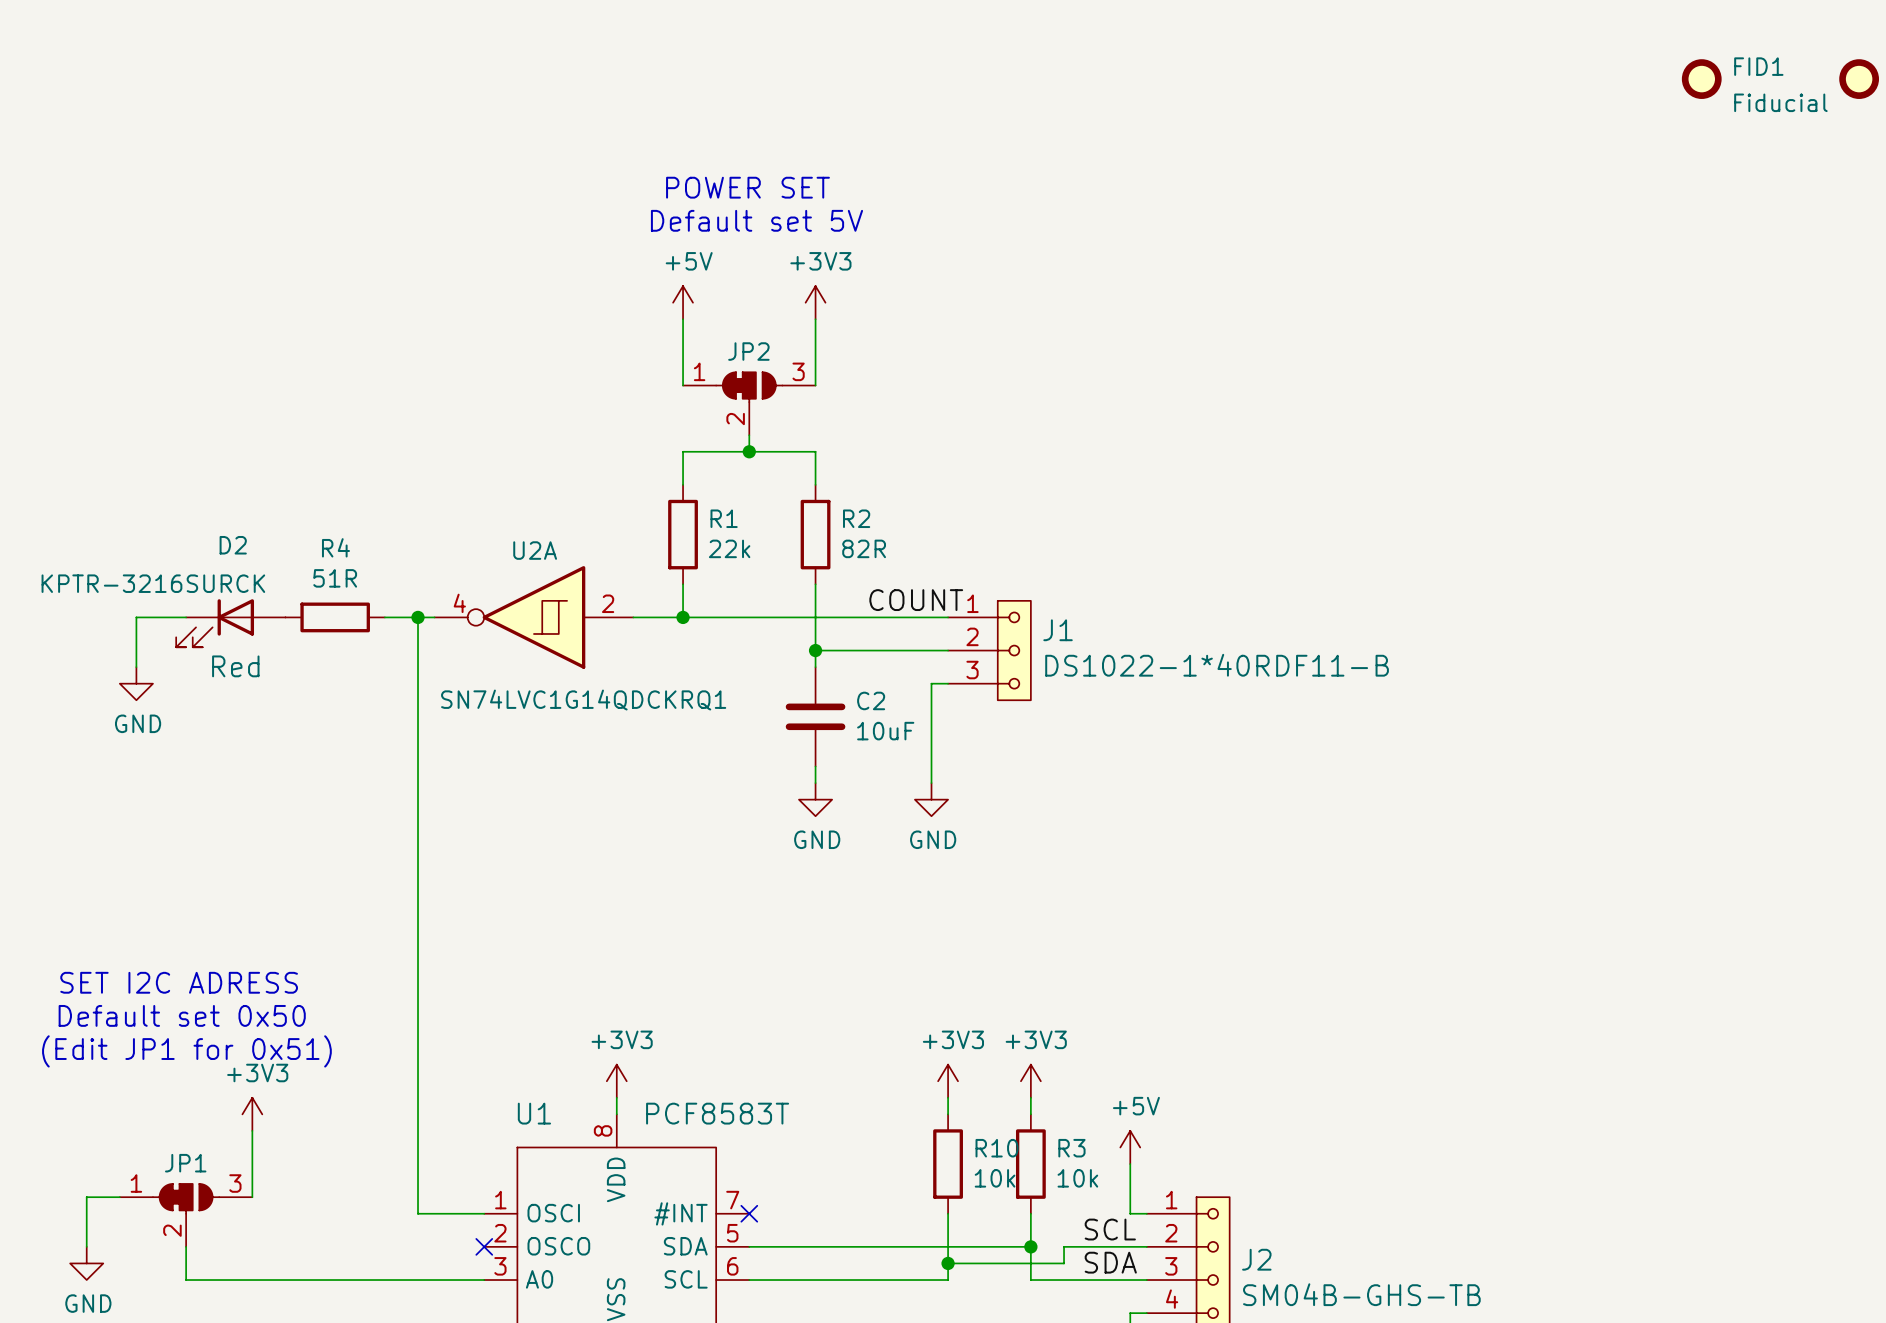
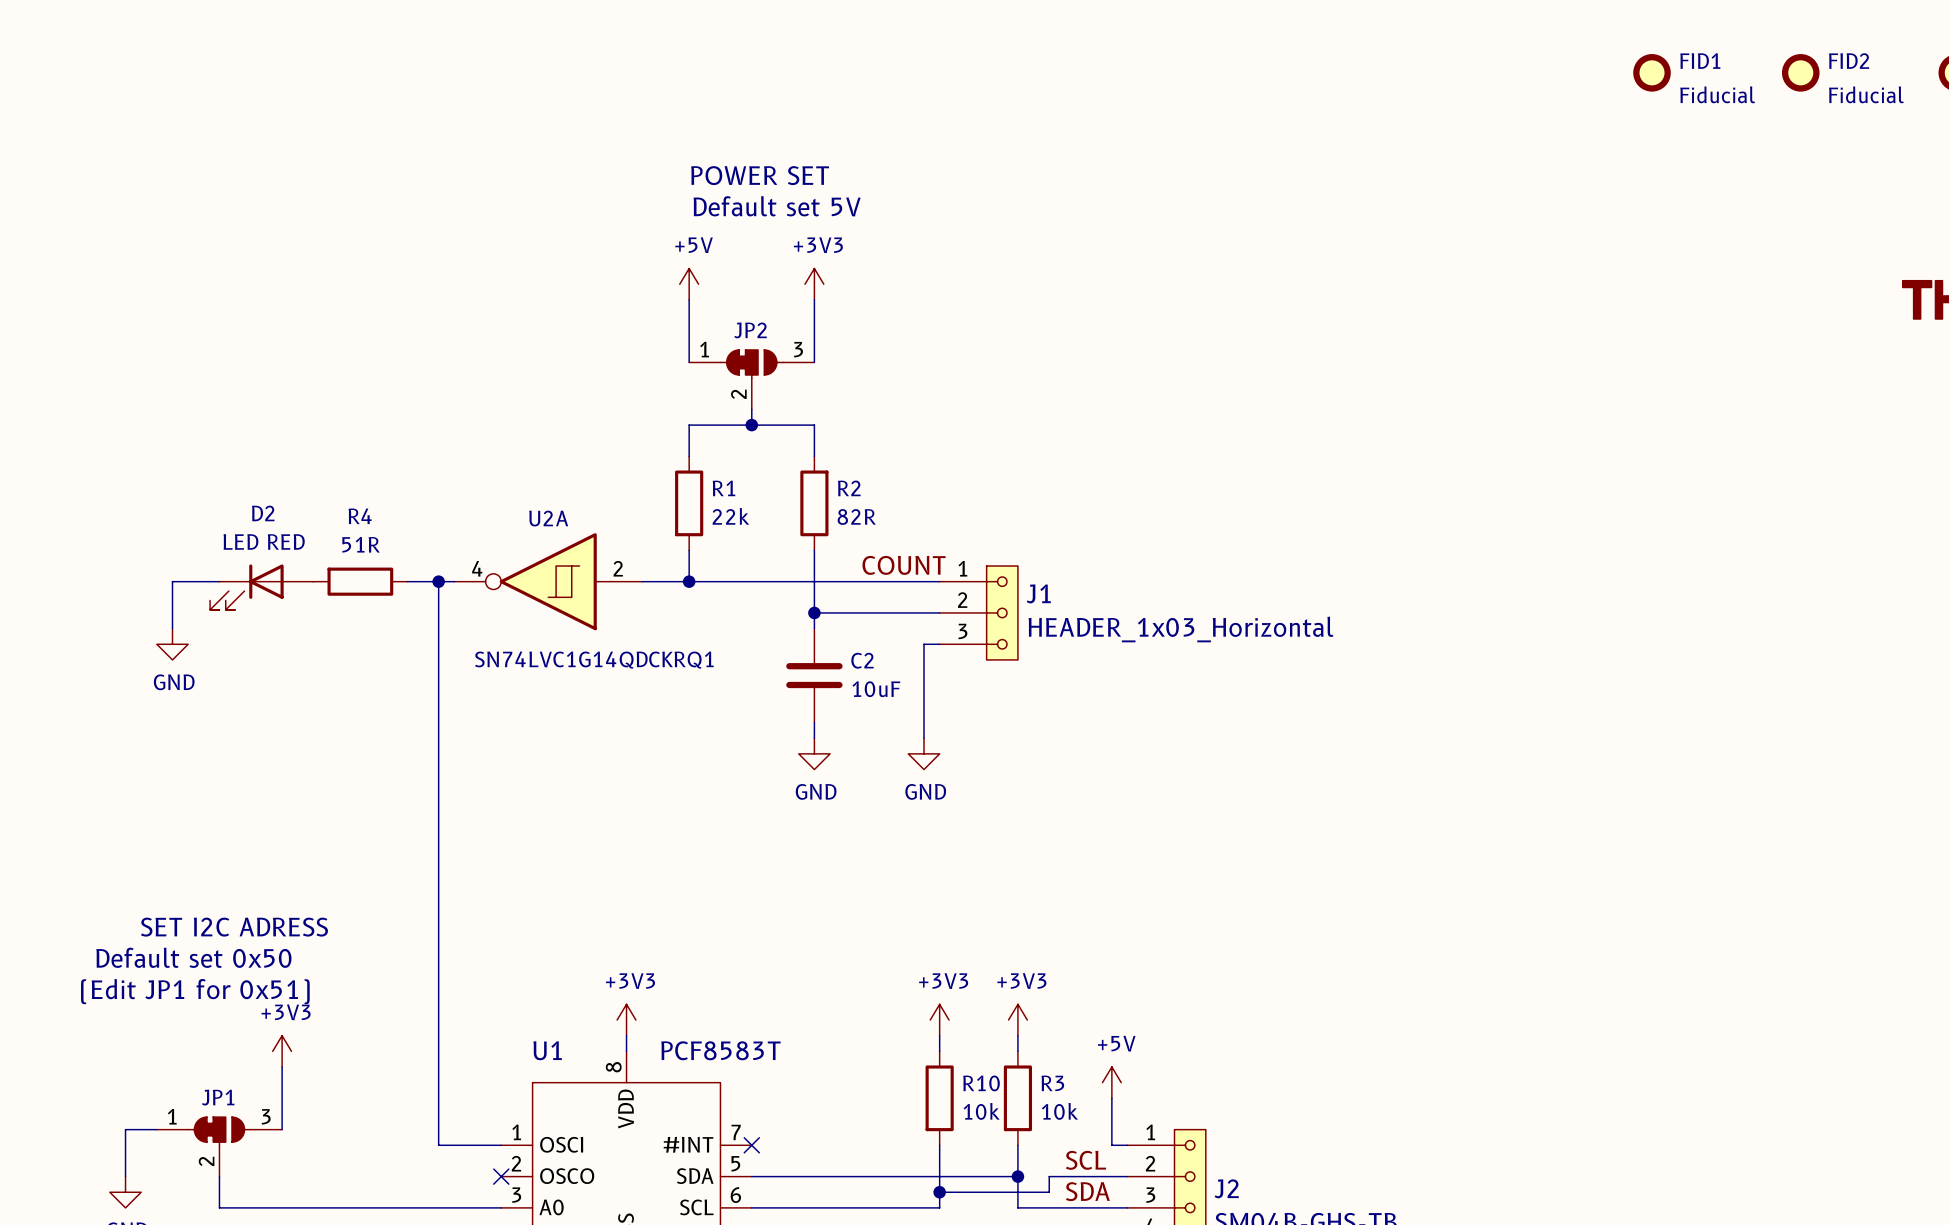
D2 value: KPTR-3216SURCK (153, 583) -> LED RED (264, 541)
J1 value: DS1022-1*40RDF11-B (1217, 665) -> HEADER_1x03_Horizontal (1181, 629)
D2 text: Red (235, 666) -> none

